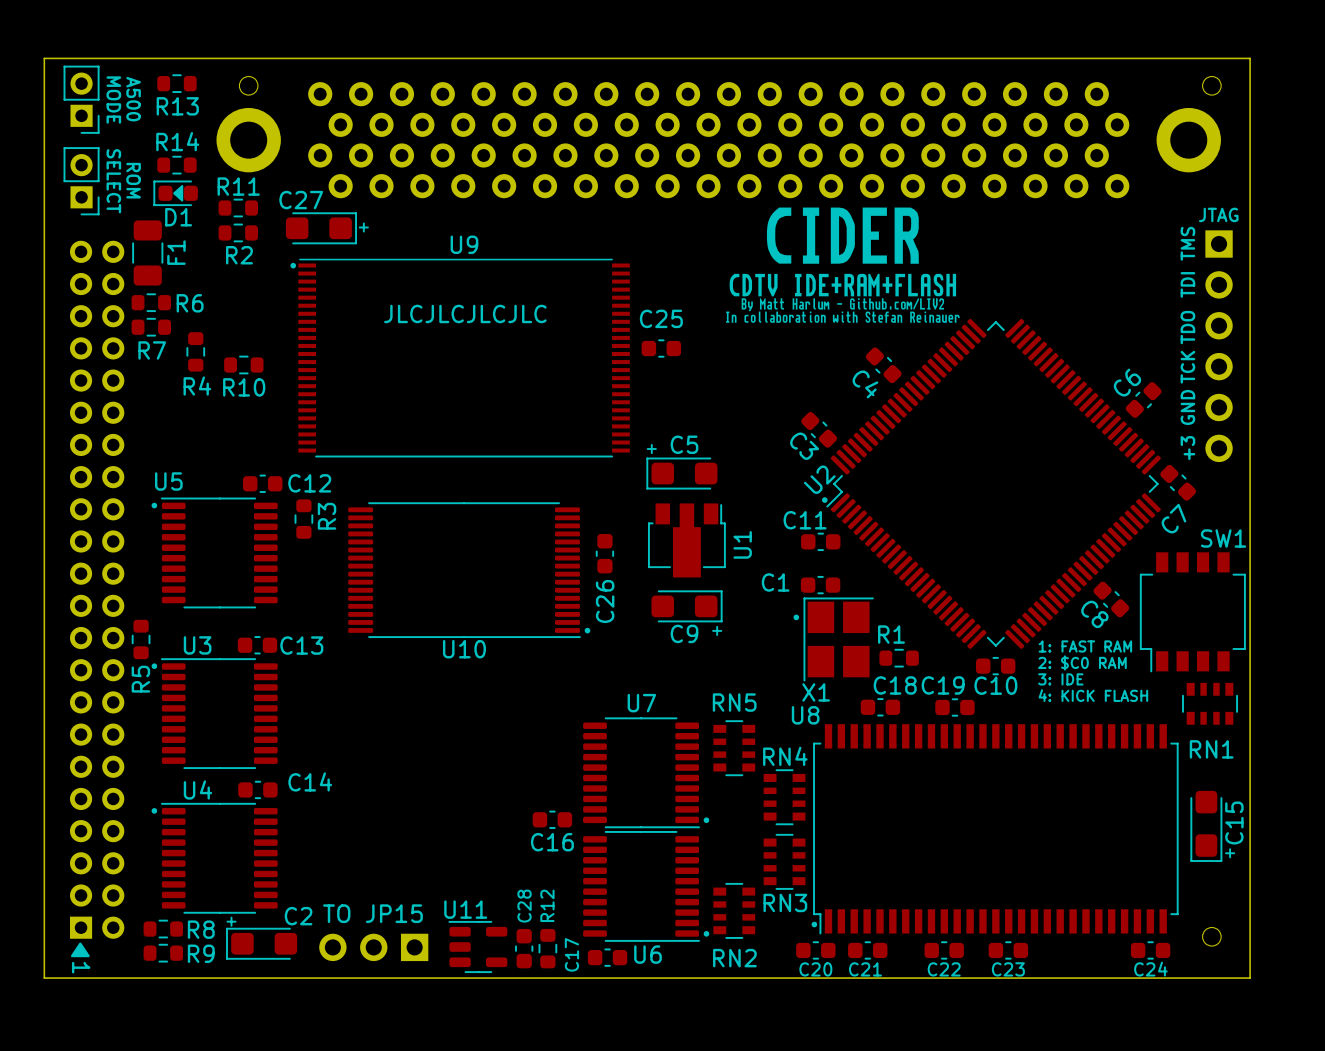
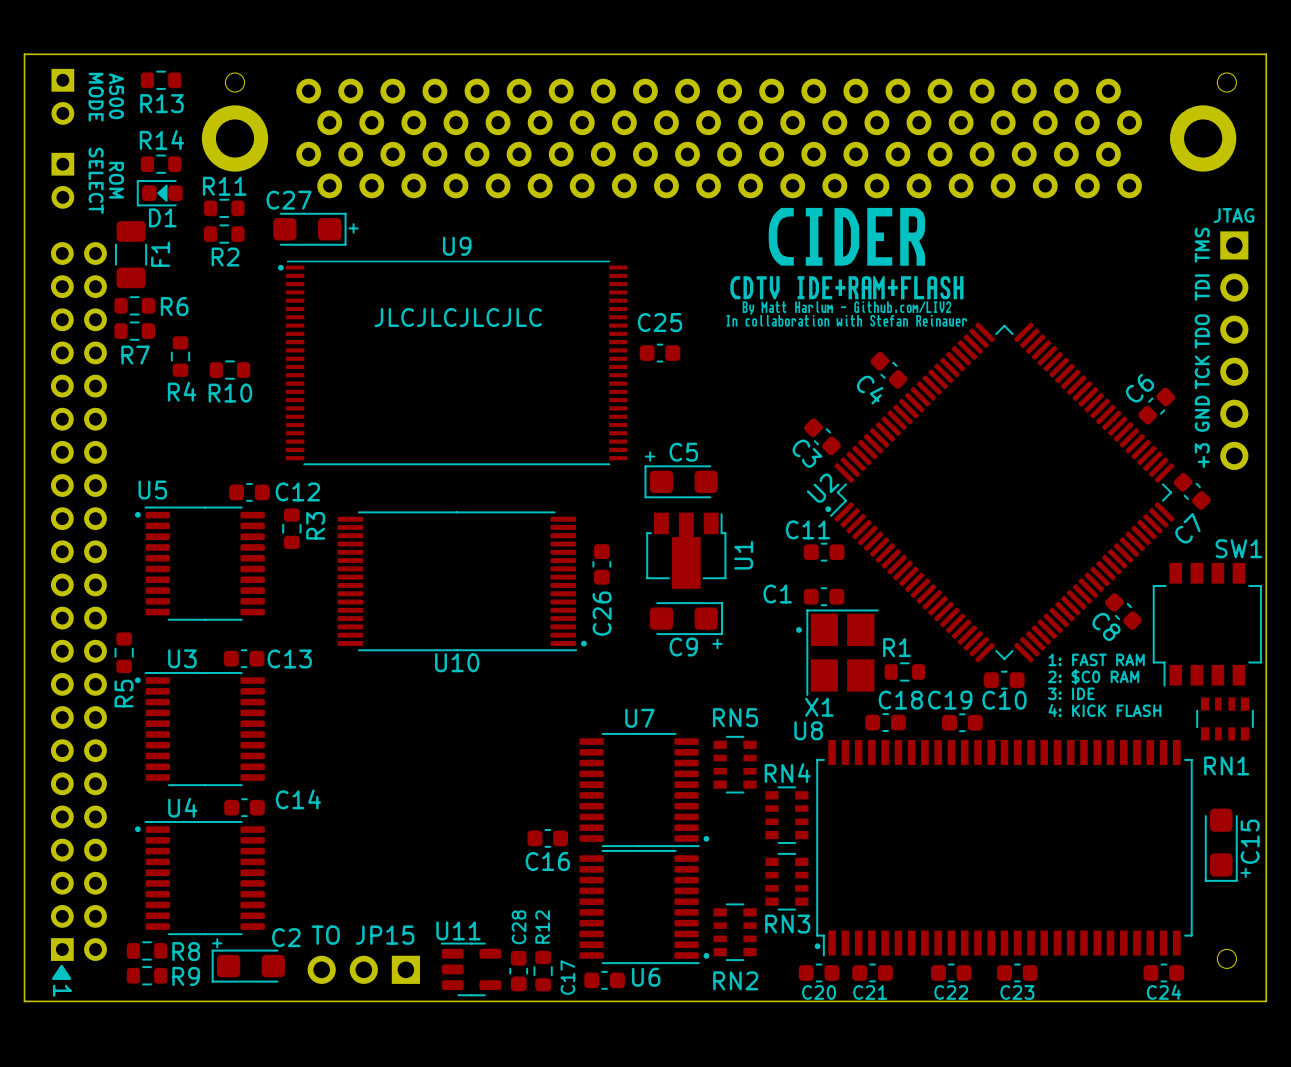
part side: top (81, 99) -> bottom (62, 96)
part side: top (81, 181) -> bottom (62, 180)

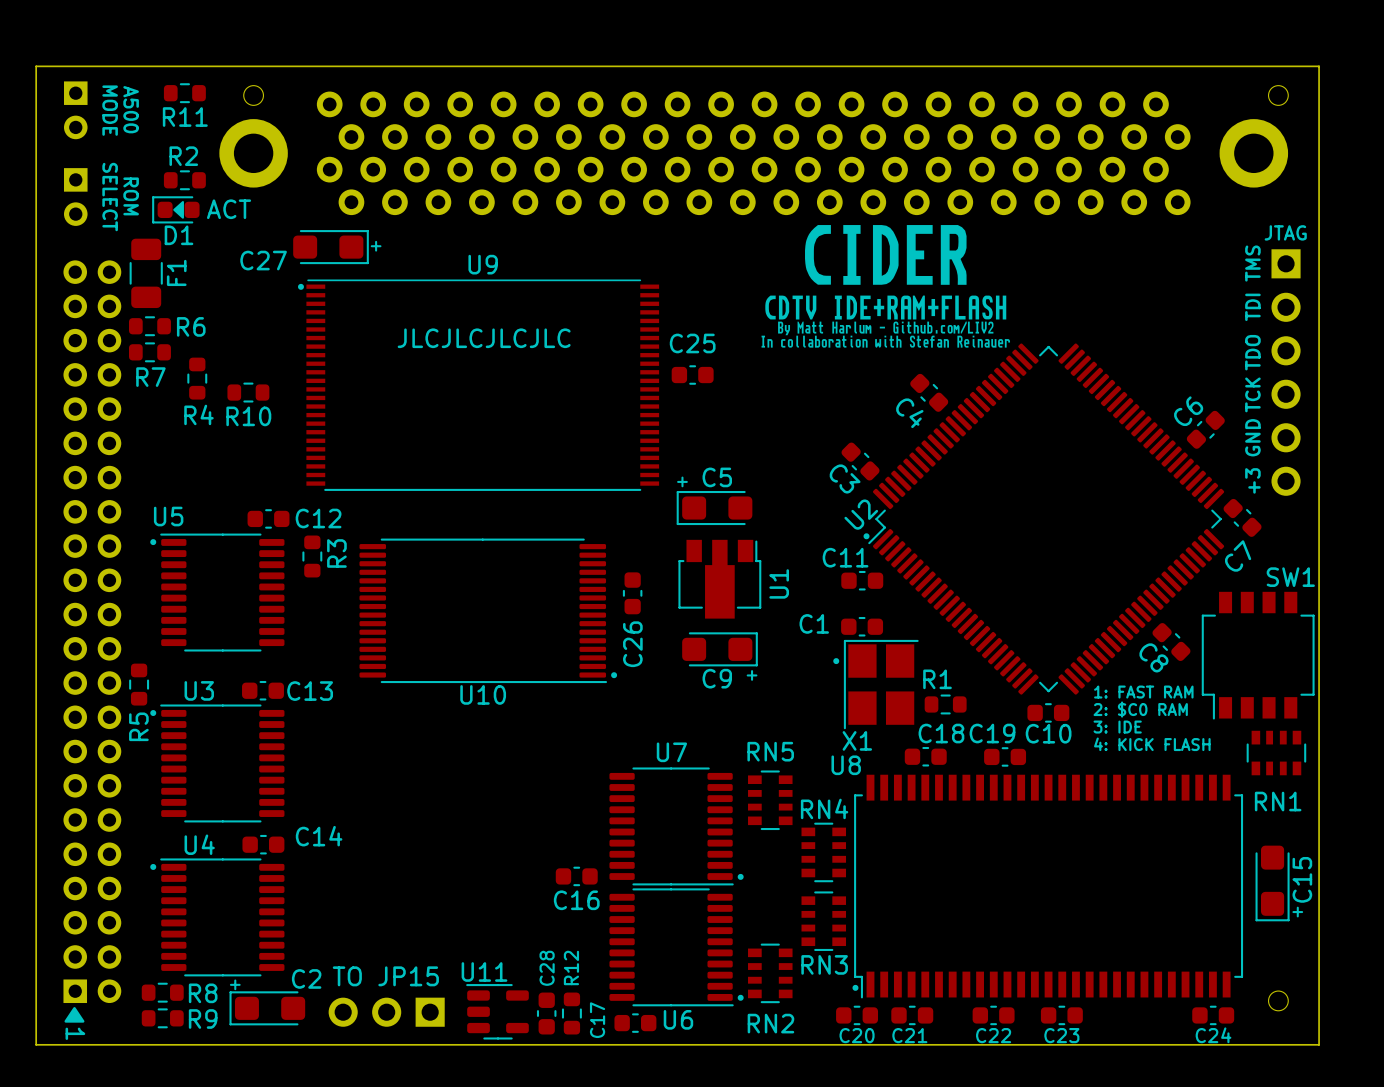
R13: (161, 80) -> none
R14: (161, 164) -> none
R11 name position: R11 (224, 186) -> R11 (185, 117)
D1 value: none -> ACT (229, 209)
C27 name position: C27 (289, 200) -> C27 (263, 260)
R11 position: (224, 208) -> (184, 93)
R2 position: (224, 234) -> (184, 180)
R2 name position: R2 (225, 257) -> R2 (183, 156)

